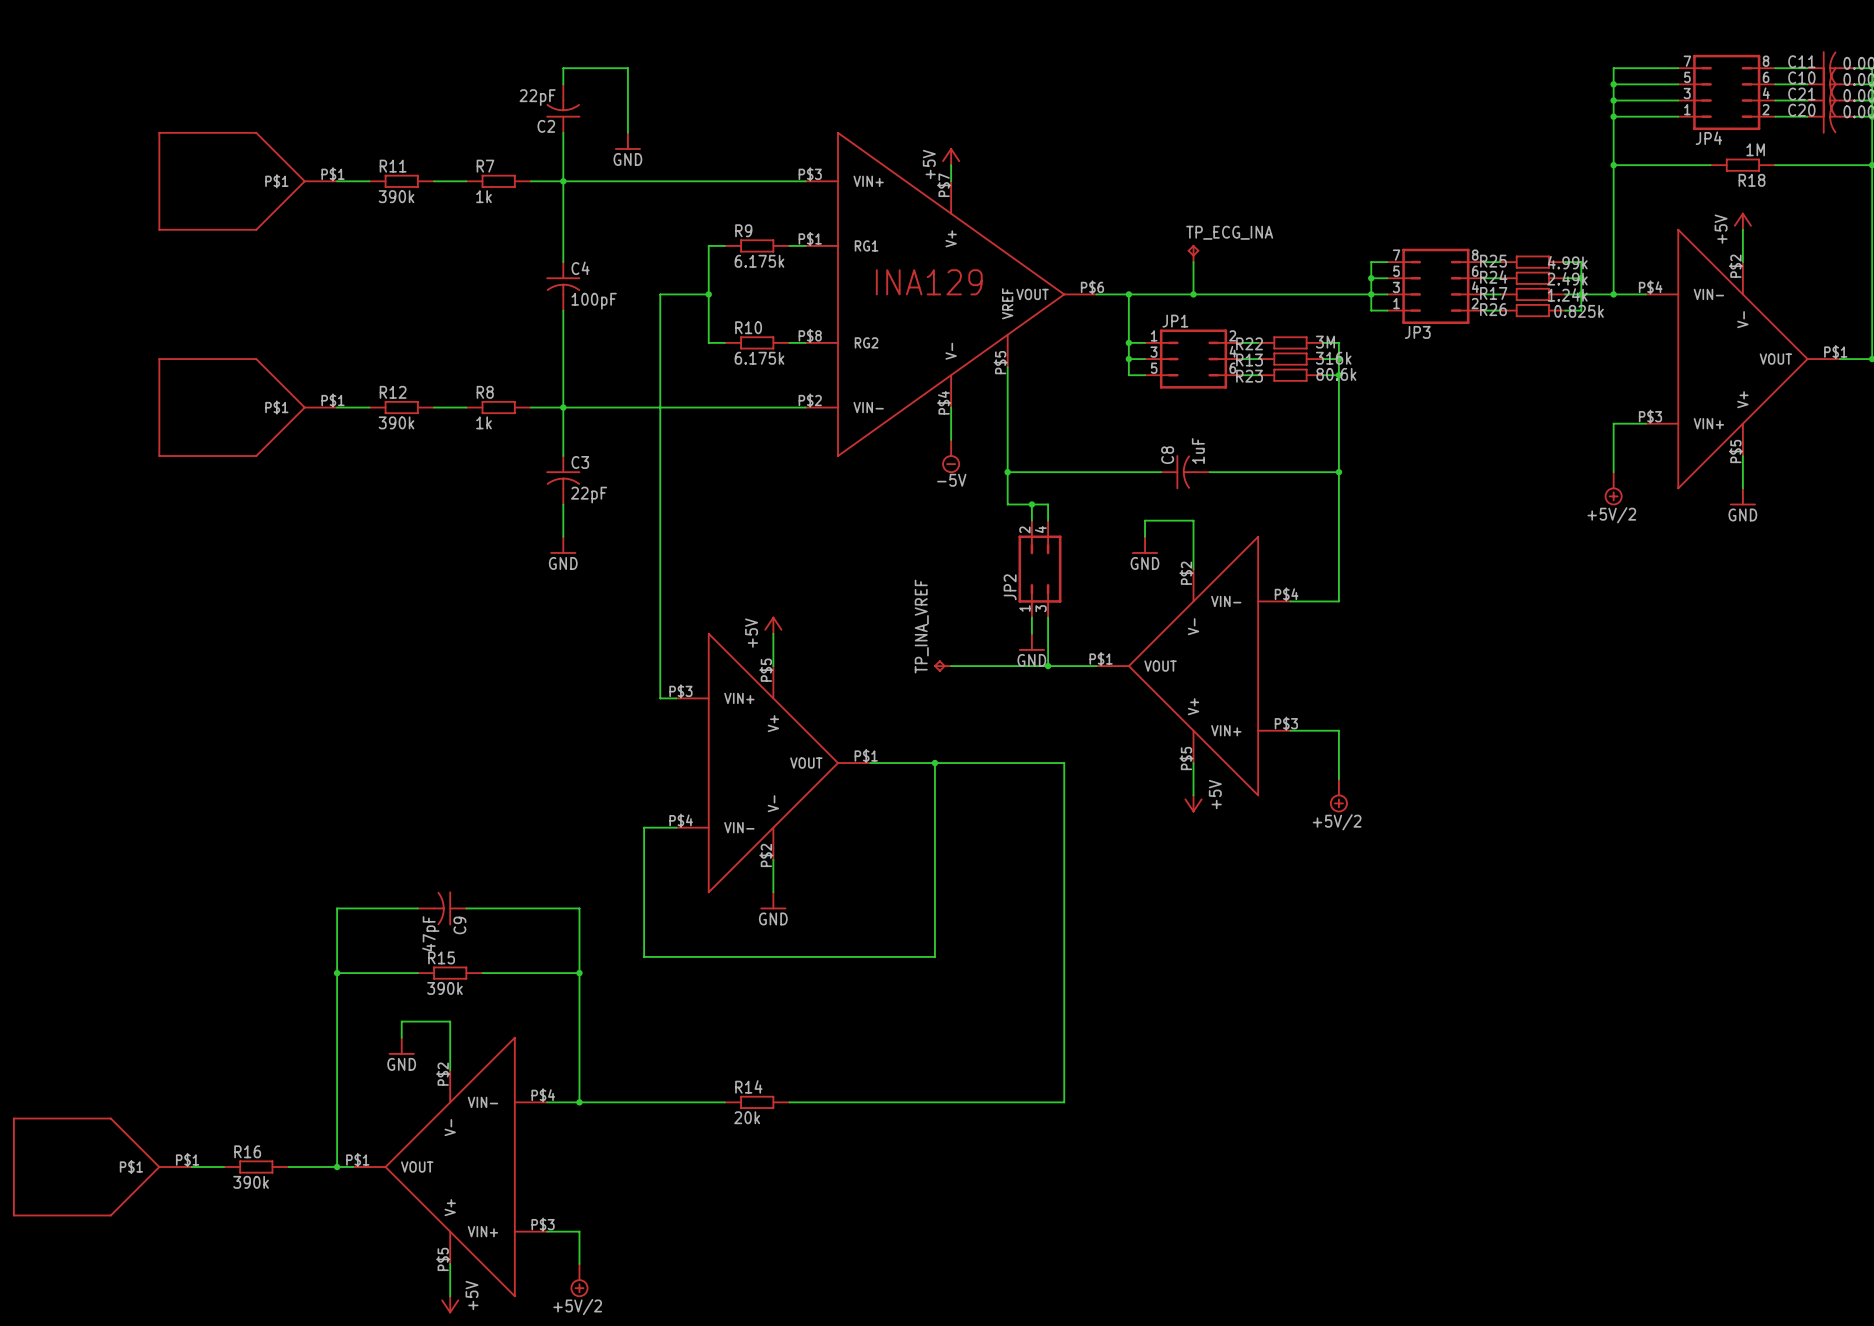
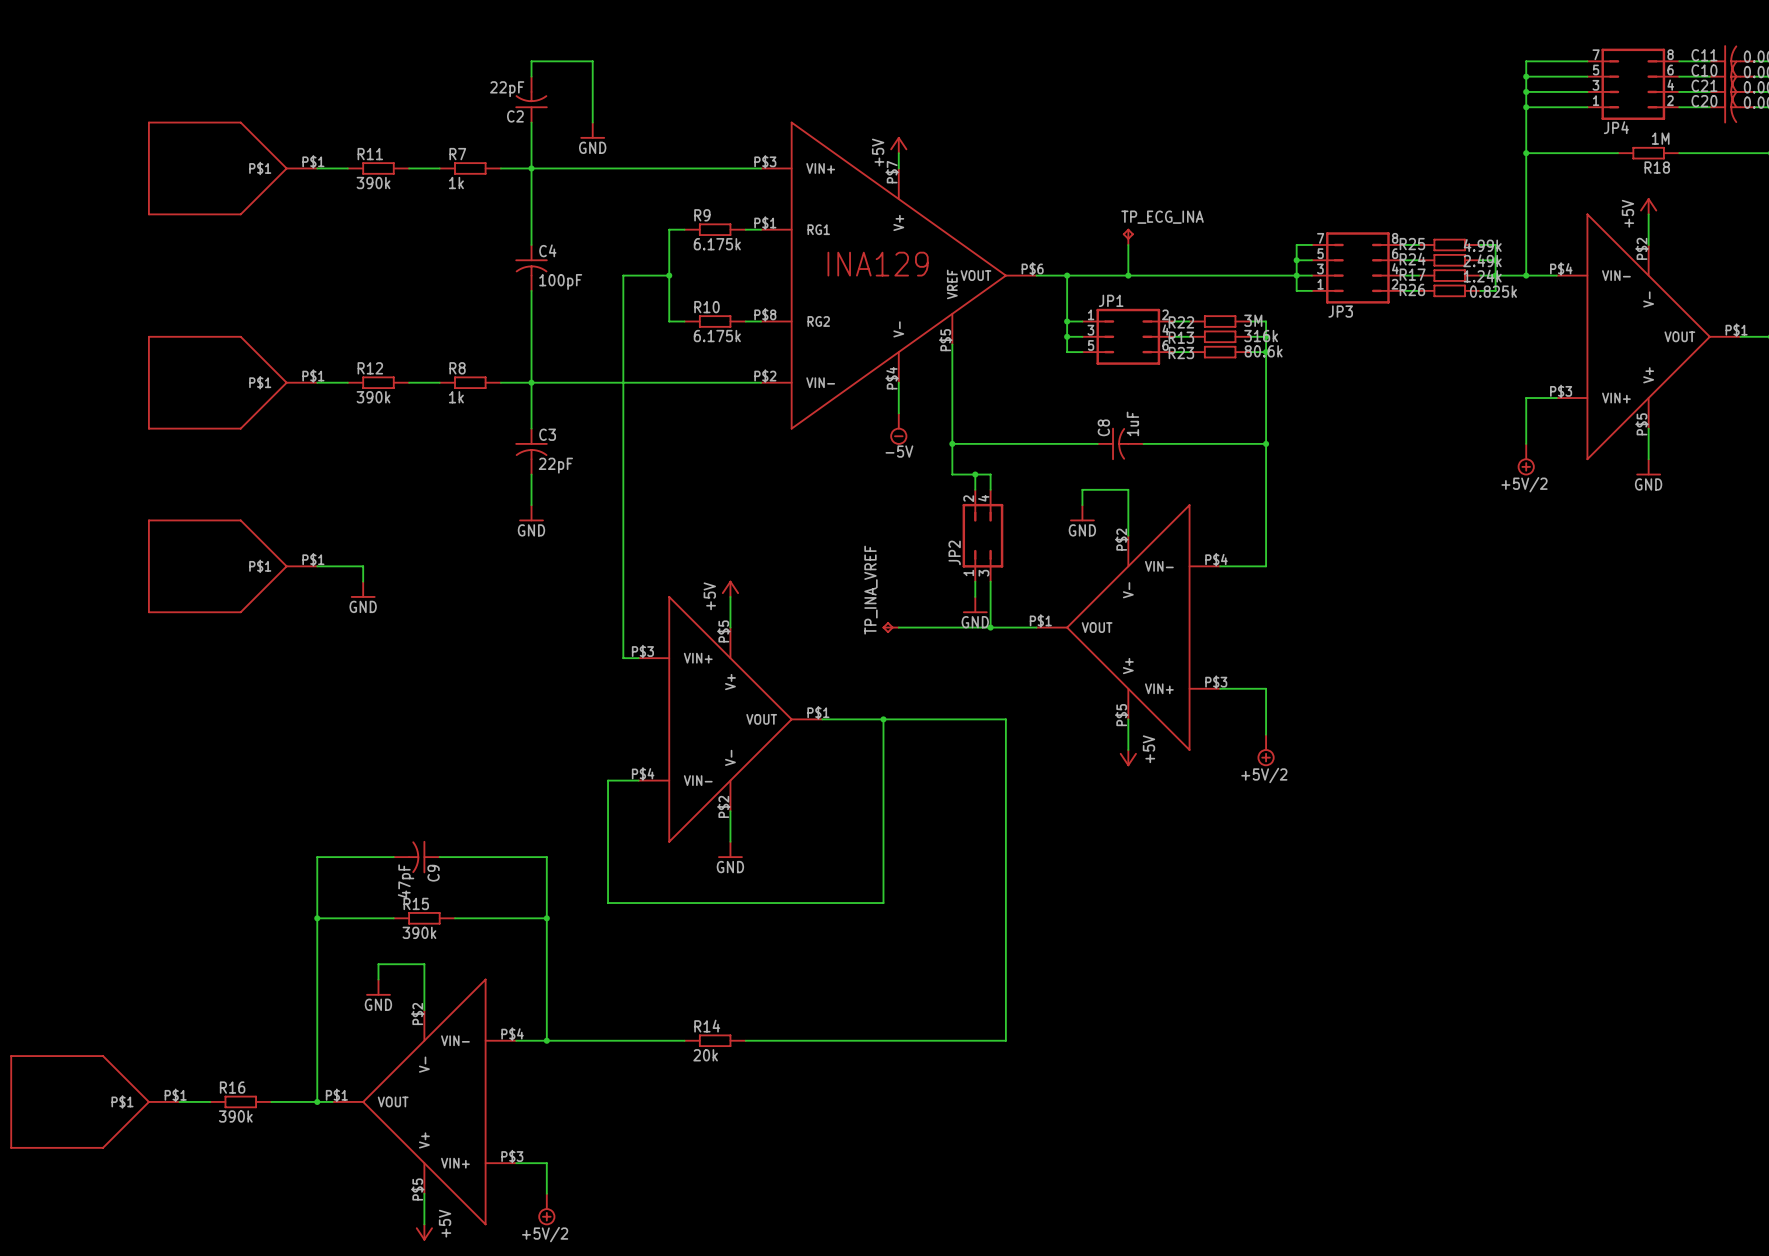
part: none -> (232, 566)
wire: none -> (317, 566) (363, 566) (363, 581)
power symbol: none -> GND (363, 589)

